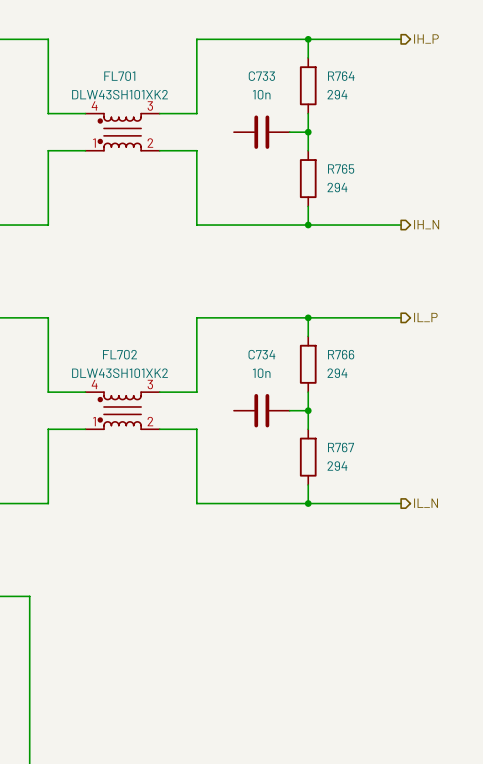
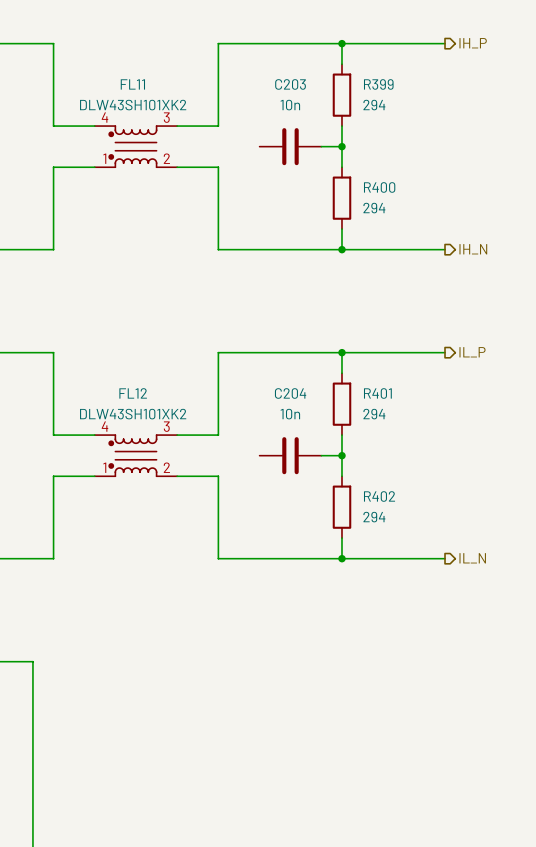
FL701 name: FL701 (119, 76) -> FL11 (132, 84)
C733 name: C733 (261, 76) -> C203 (290, 84)
R764 name: R764 (341, 76) -> R399 (378, 84)
R765 name: R765 (341, 168) -> R400 (379, 187)
FL702 name: FL702 (120, 354) -> FL12 (133, 393)
C734 name: C734 (261, 354) -> C204 (290, 393)
R766 name: R766 (341, 354) -> R401 (377, 393)
R767 name: R767 (341, 447) -> R402 (379, 496)

